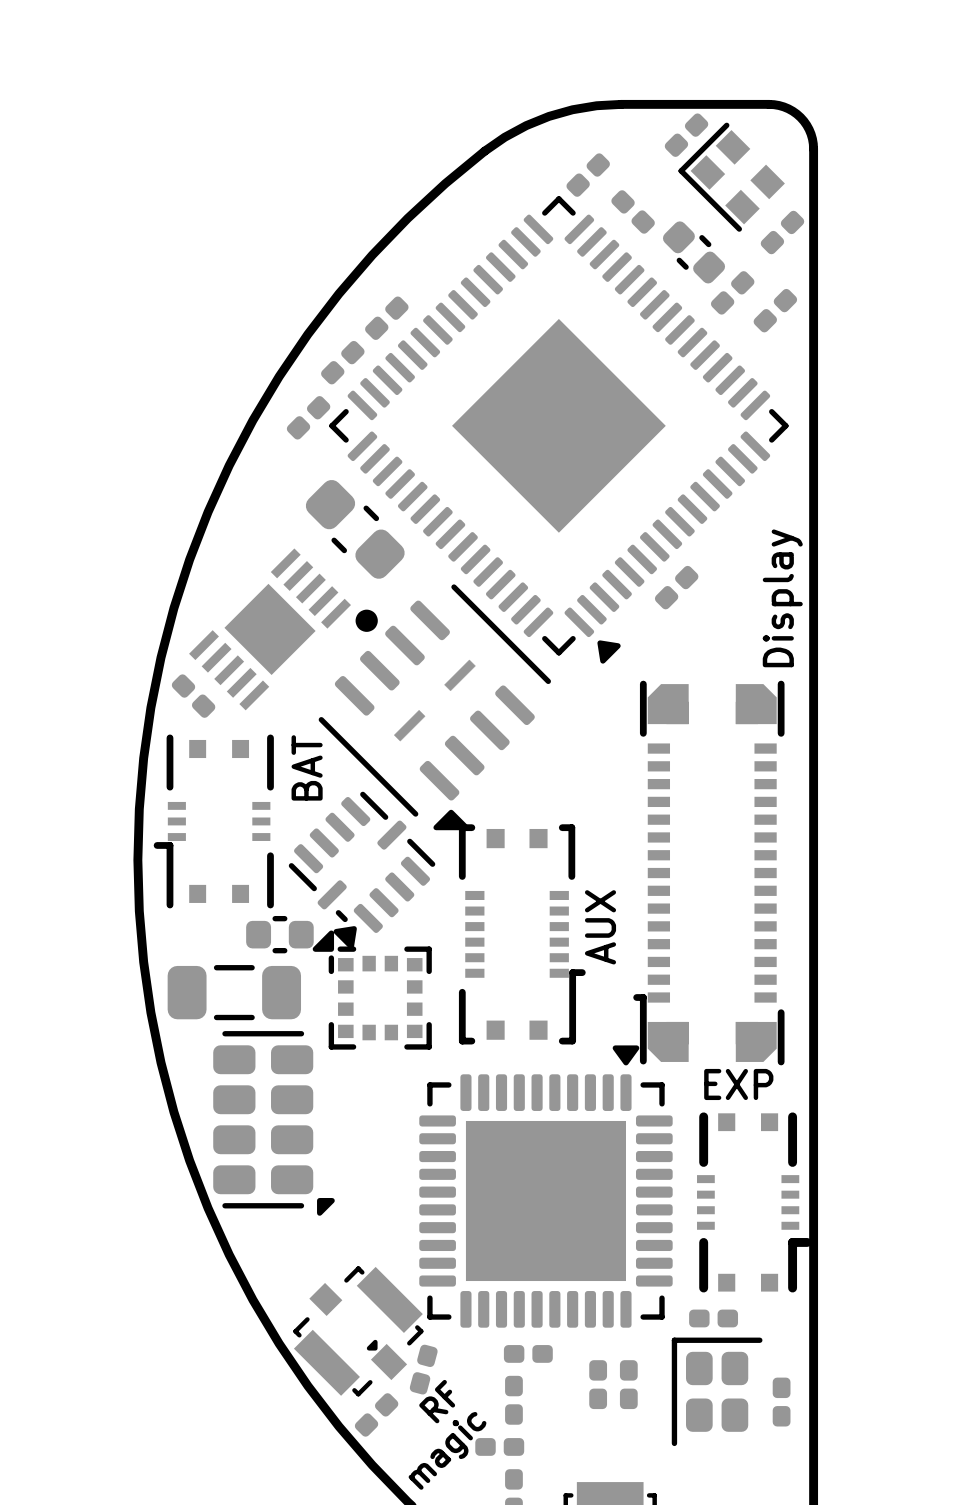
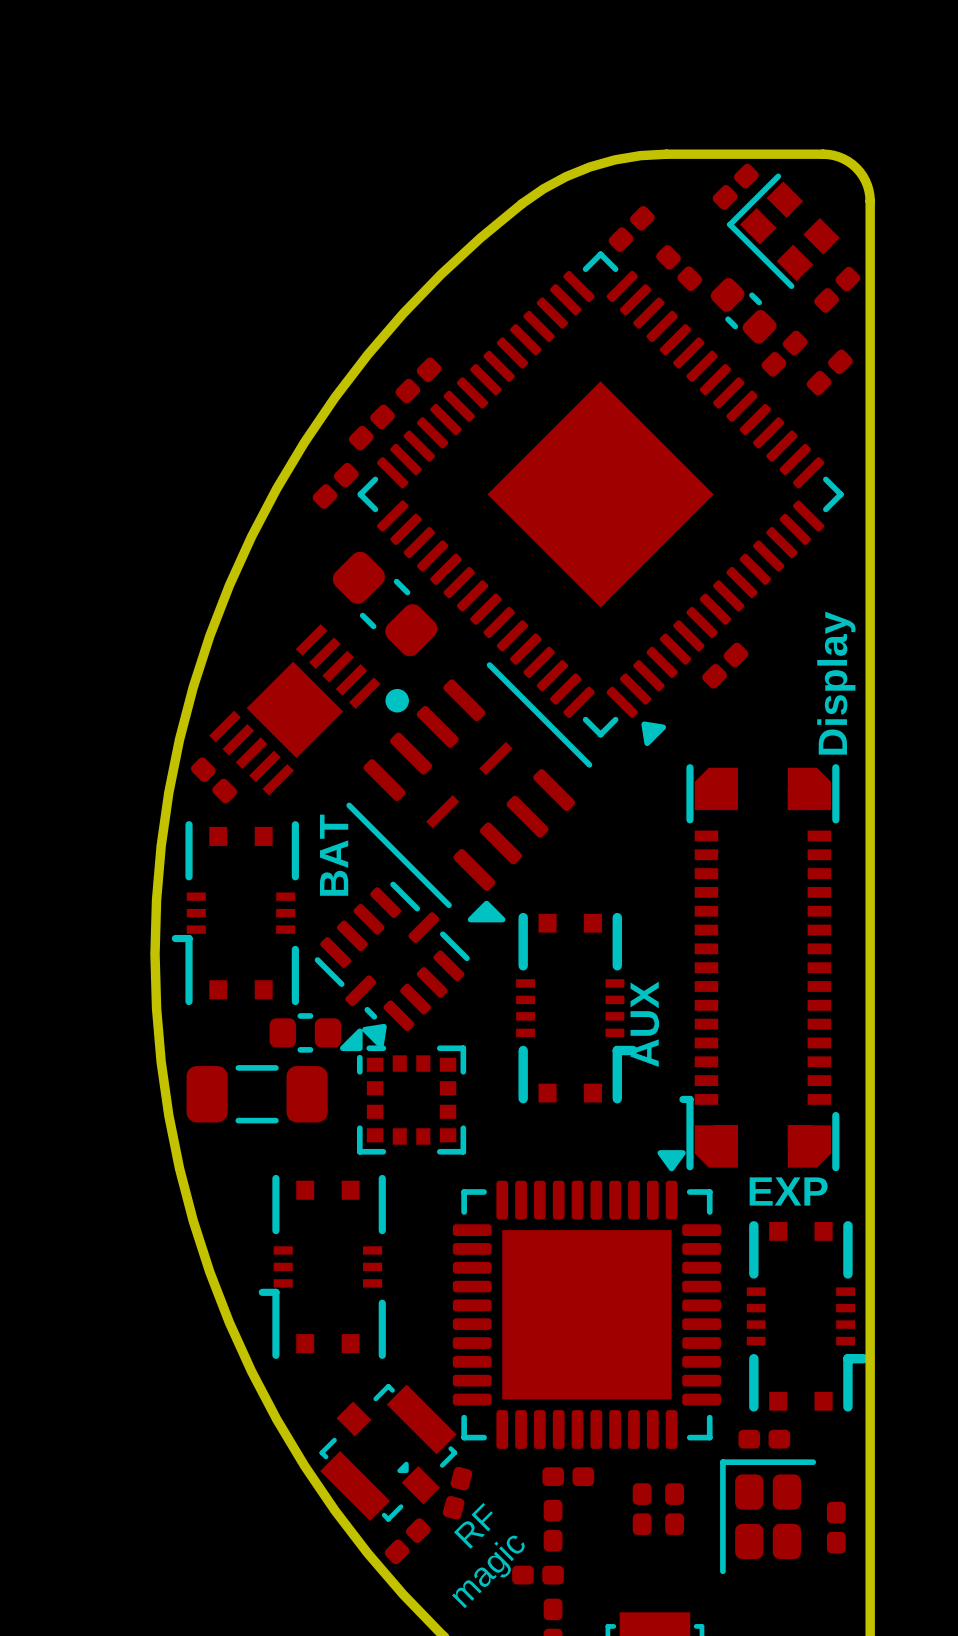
part footprint: [458, 824, 586, 1045] -> [516, 912, 638, 1104]
part footprint: [213, 1031, 335, 1216] -> [258, 1174, 386, 1359]

